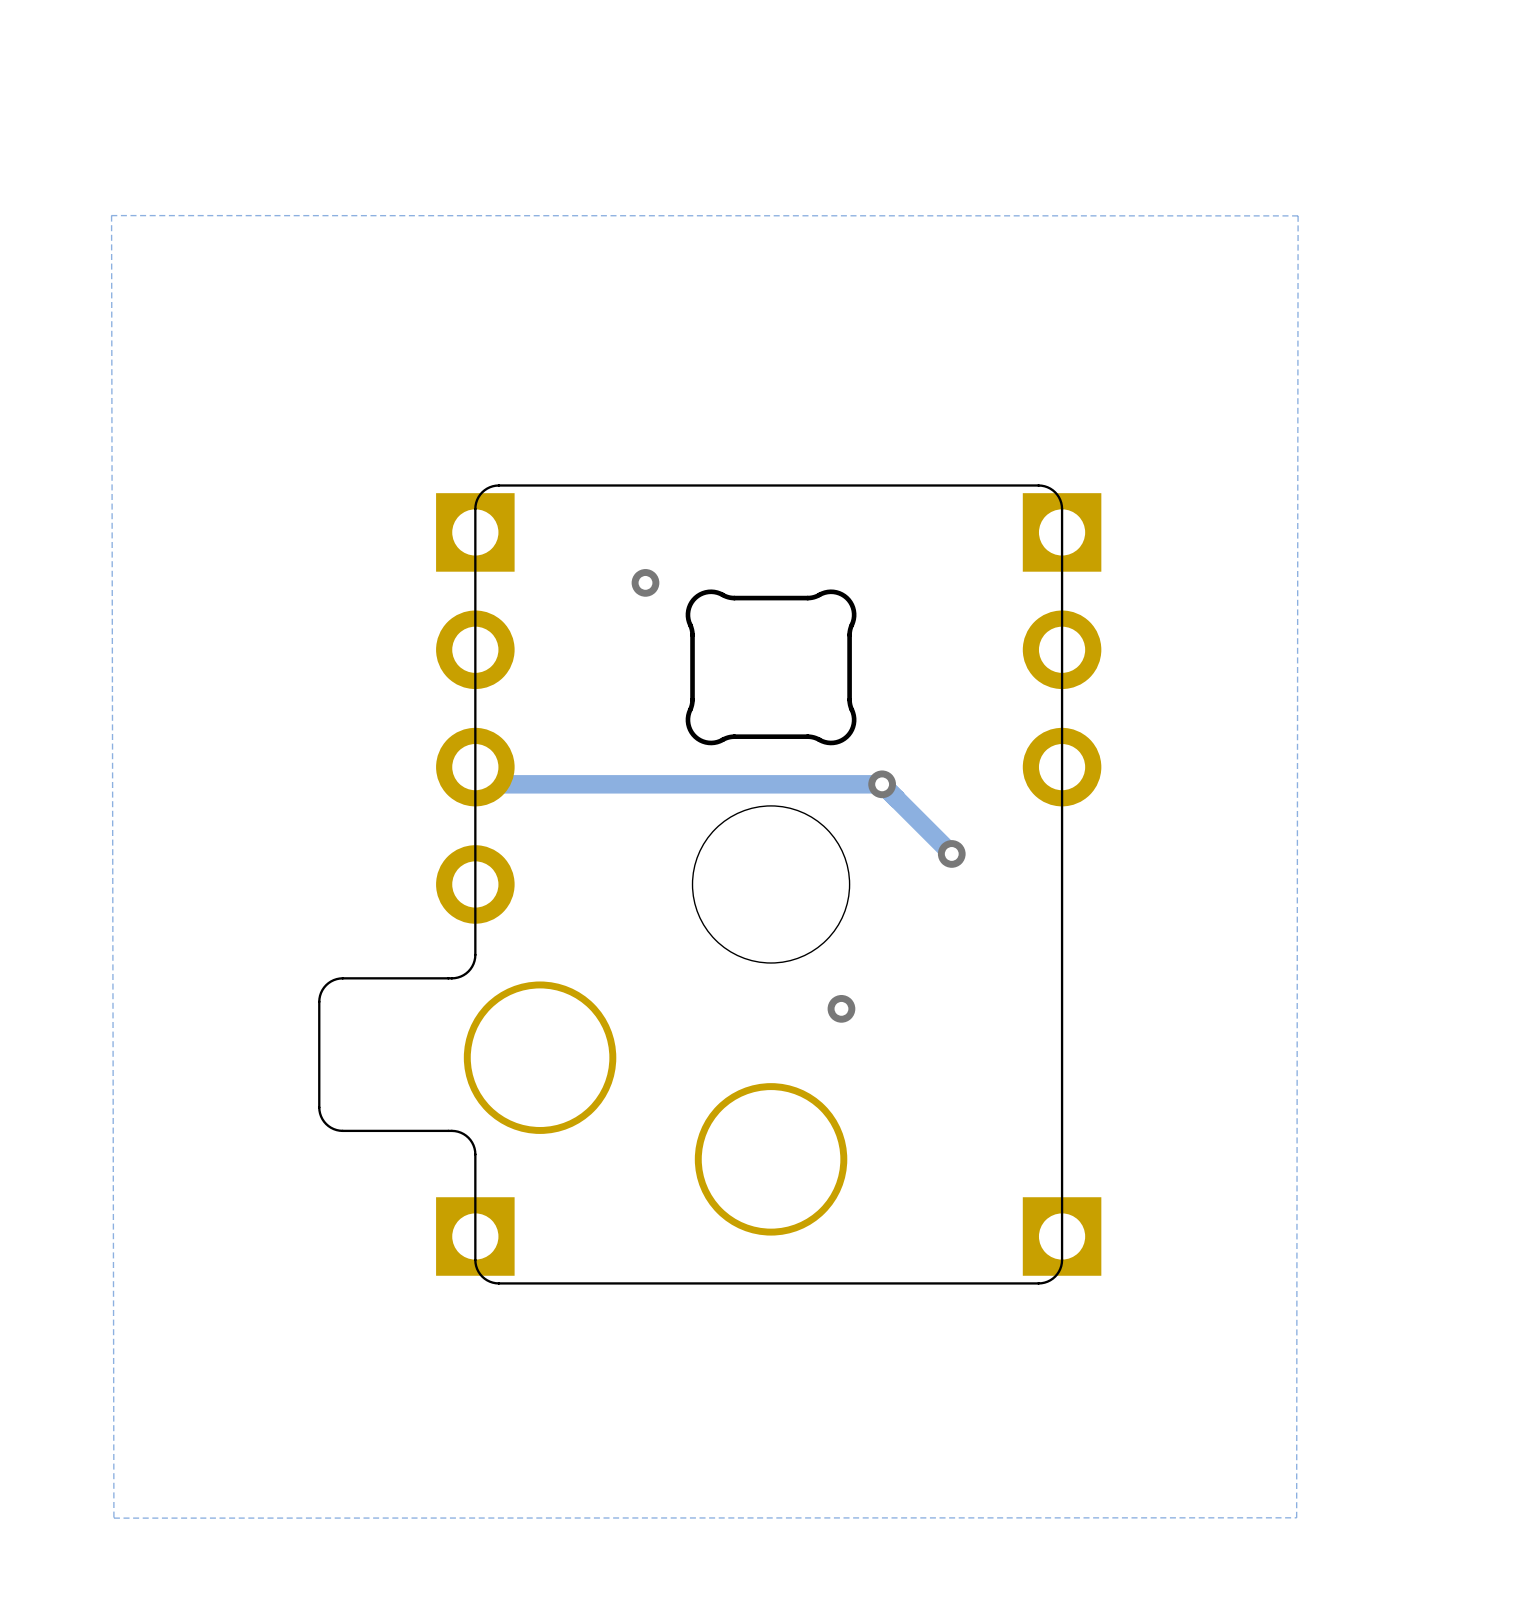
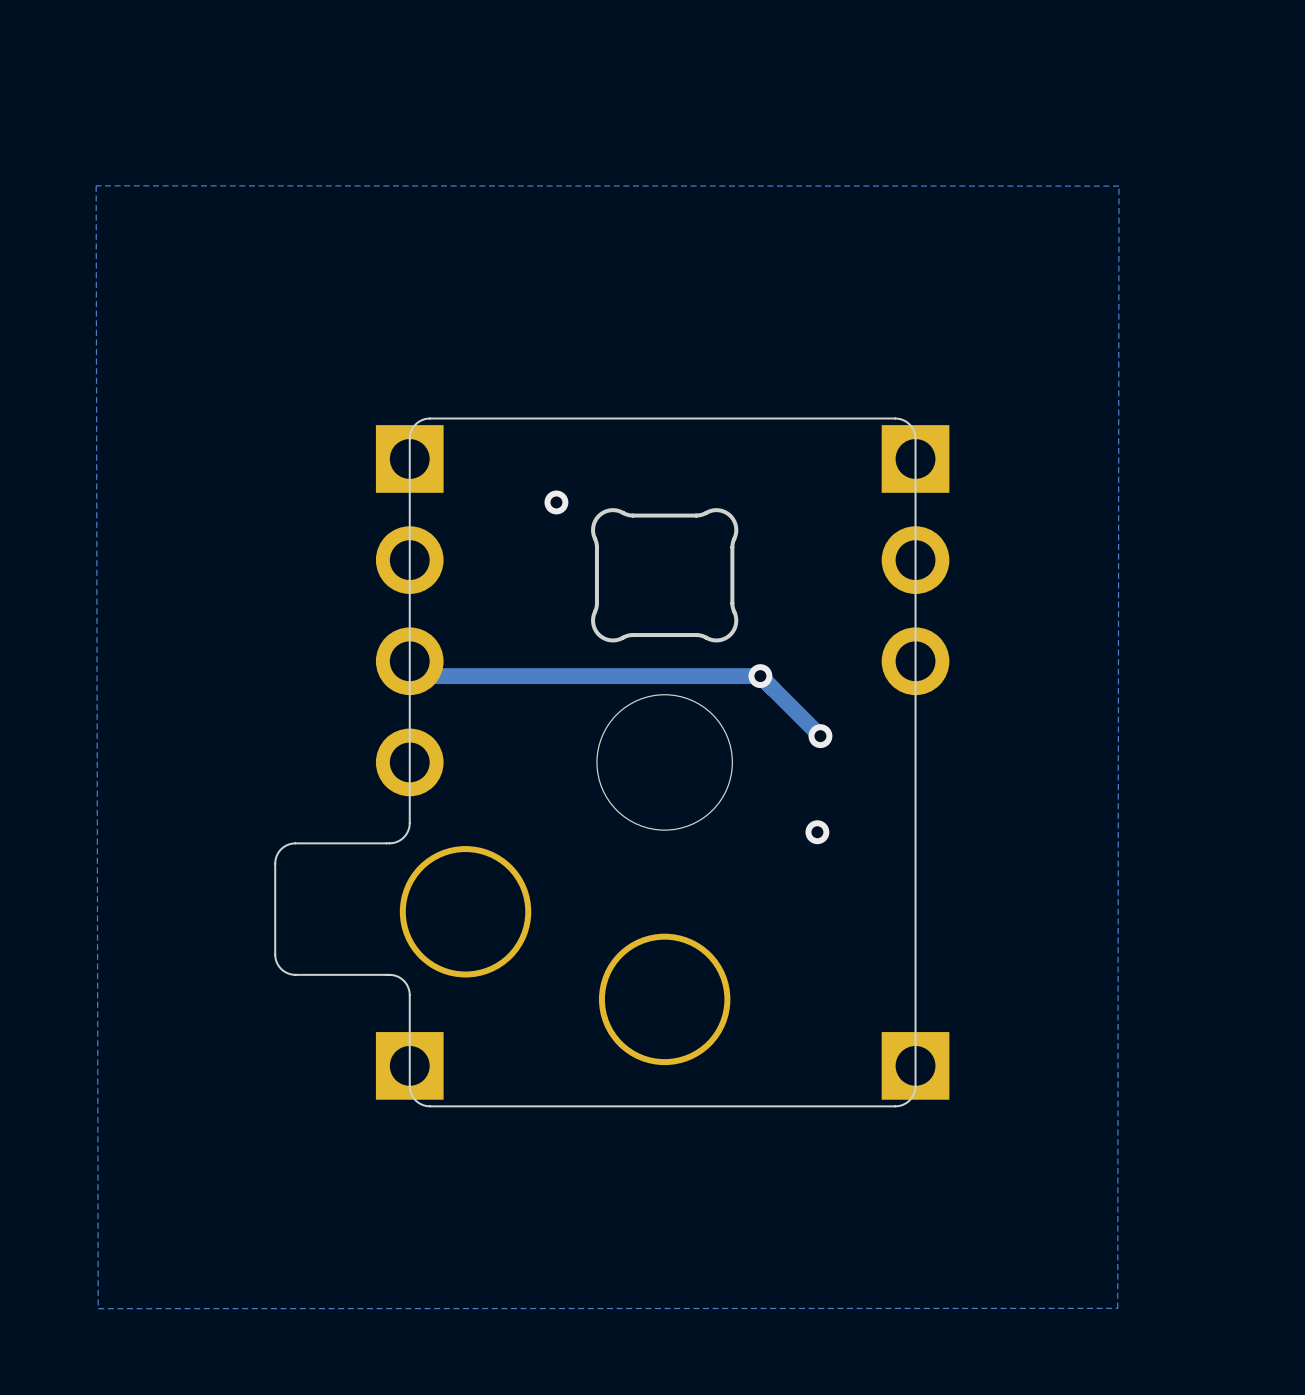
via position: (841, 1008) -> (817, 832)

